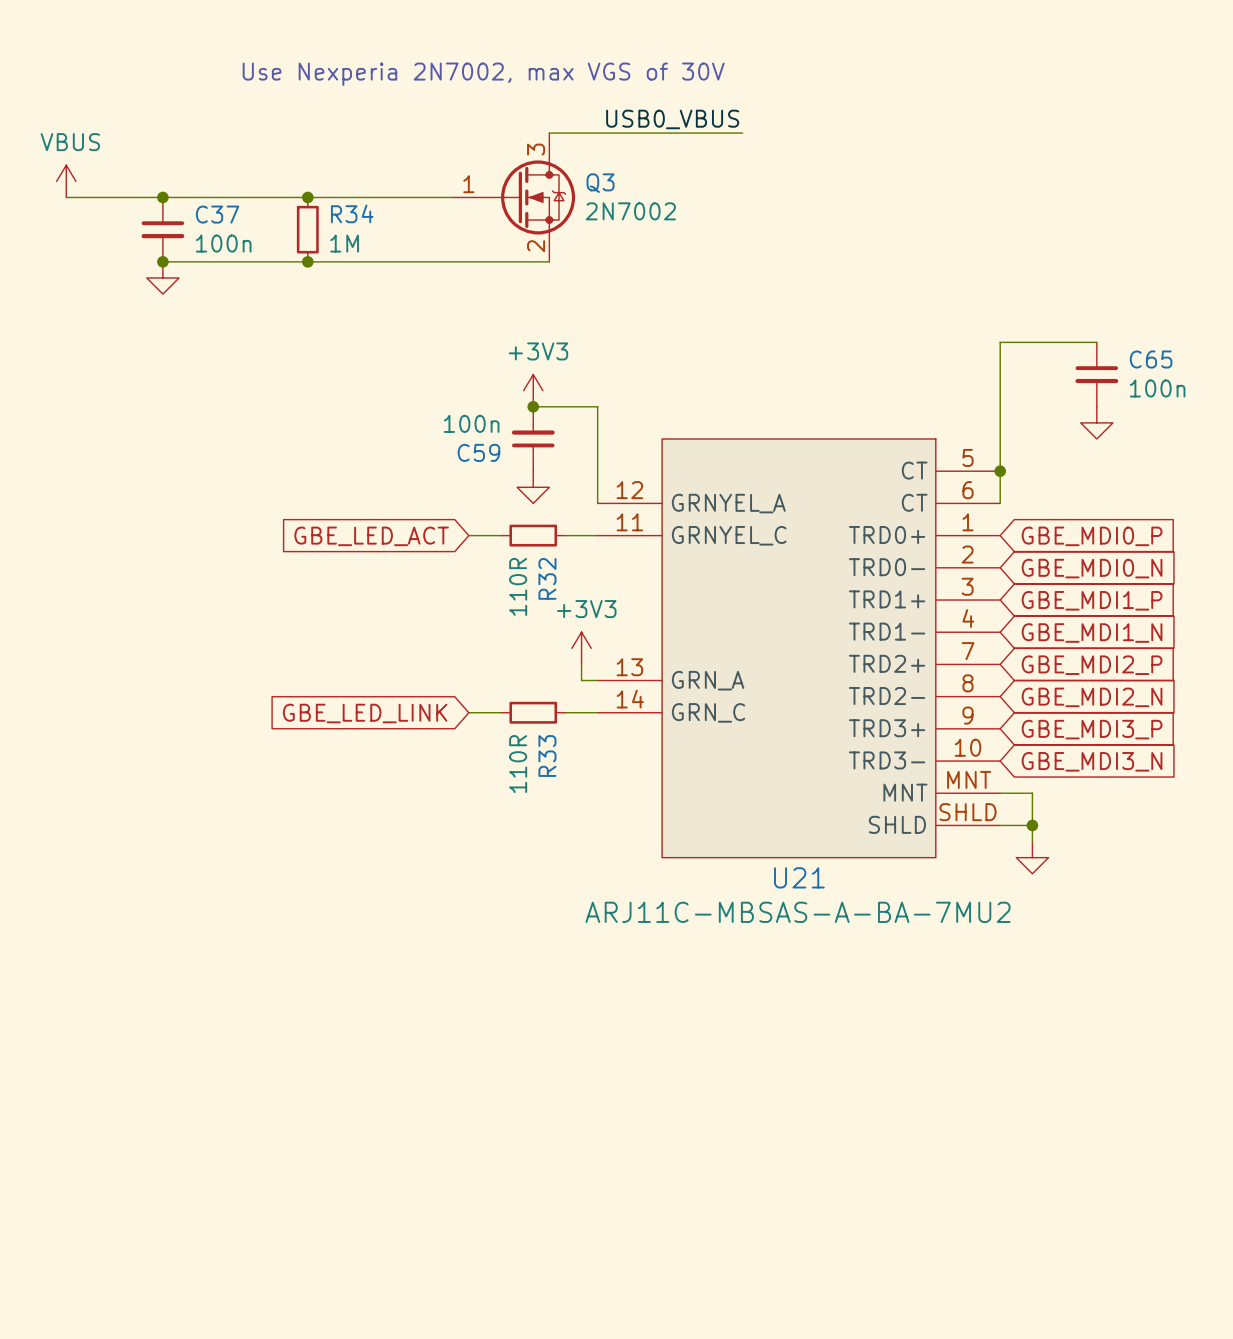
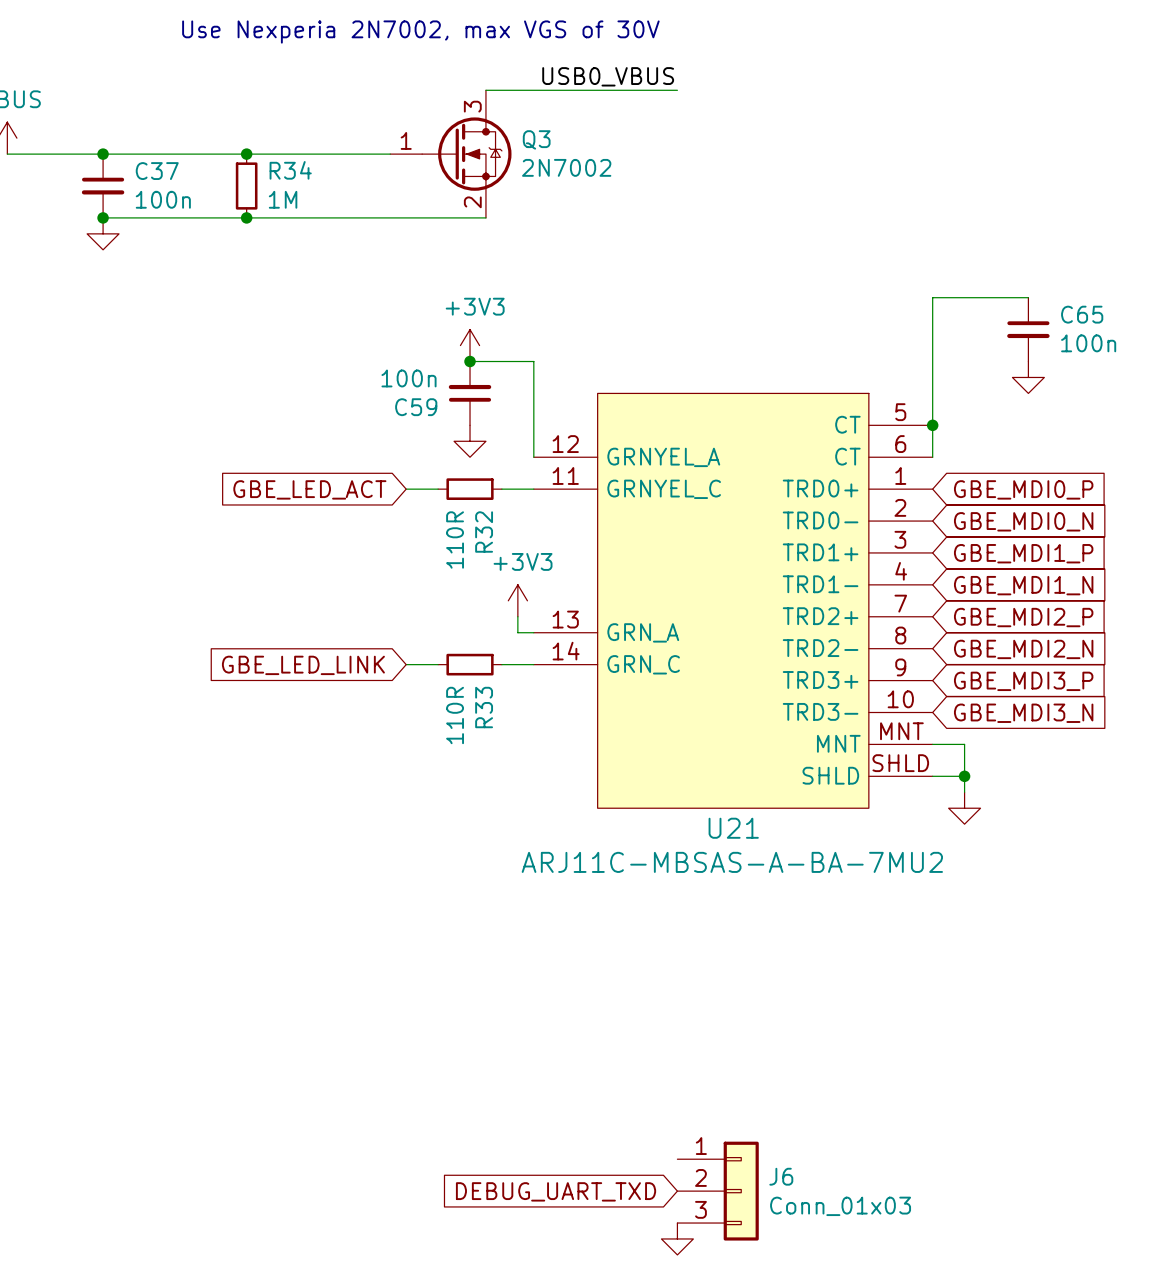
global label: none -> DEBUG_UART_TXD (556, 1191)
J6: none -> Conn_01x03 (718, 1191)
power symbol: none -> (677, 1238)

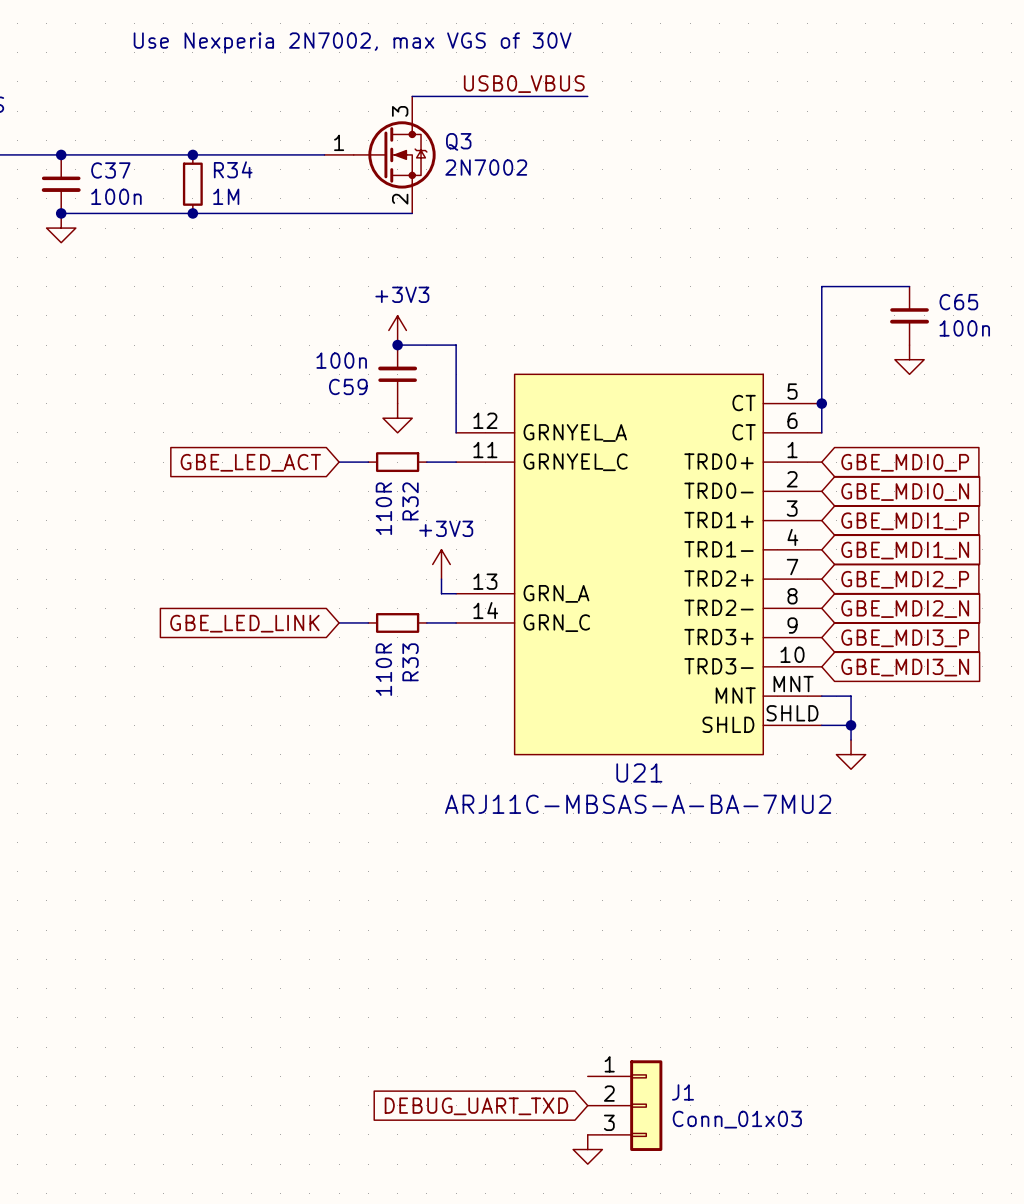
J6 name: J6 (781, 1176) -> J1 (683, 1092)

